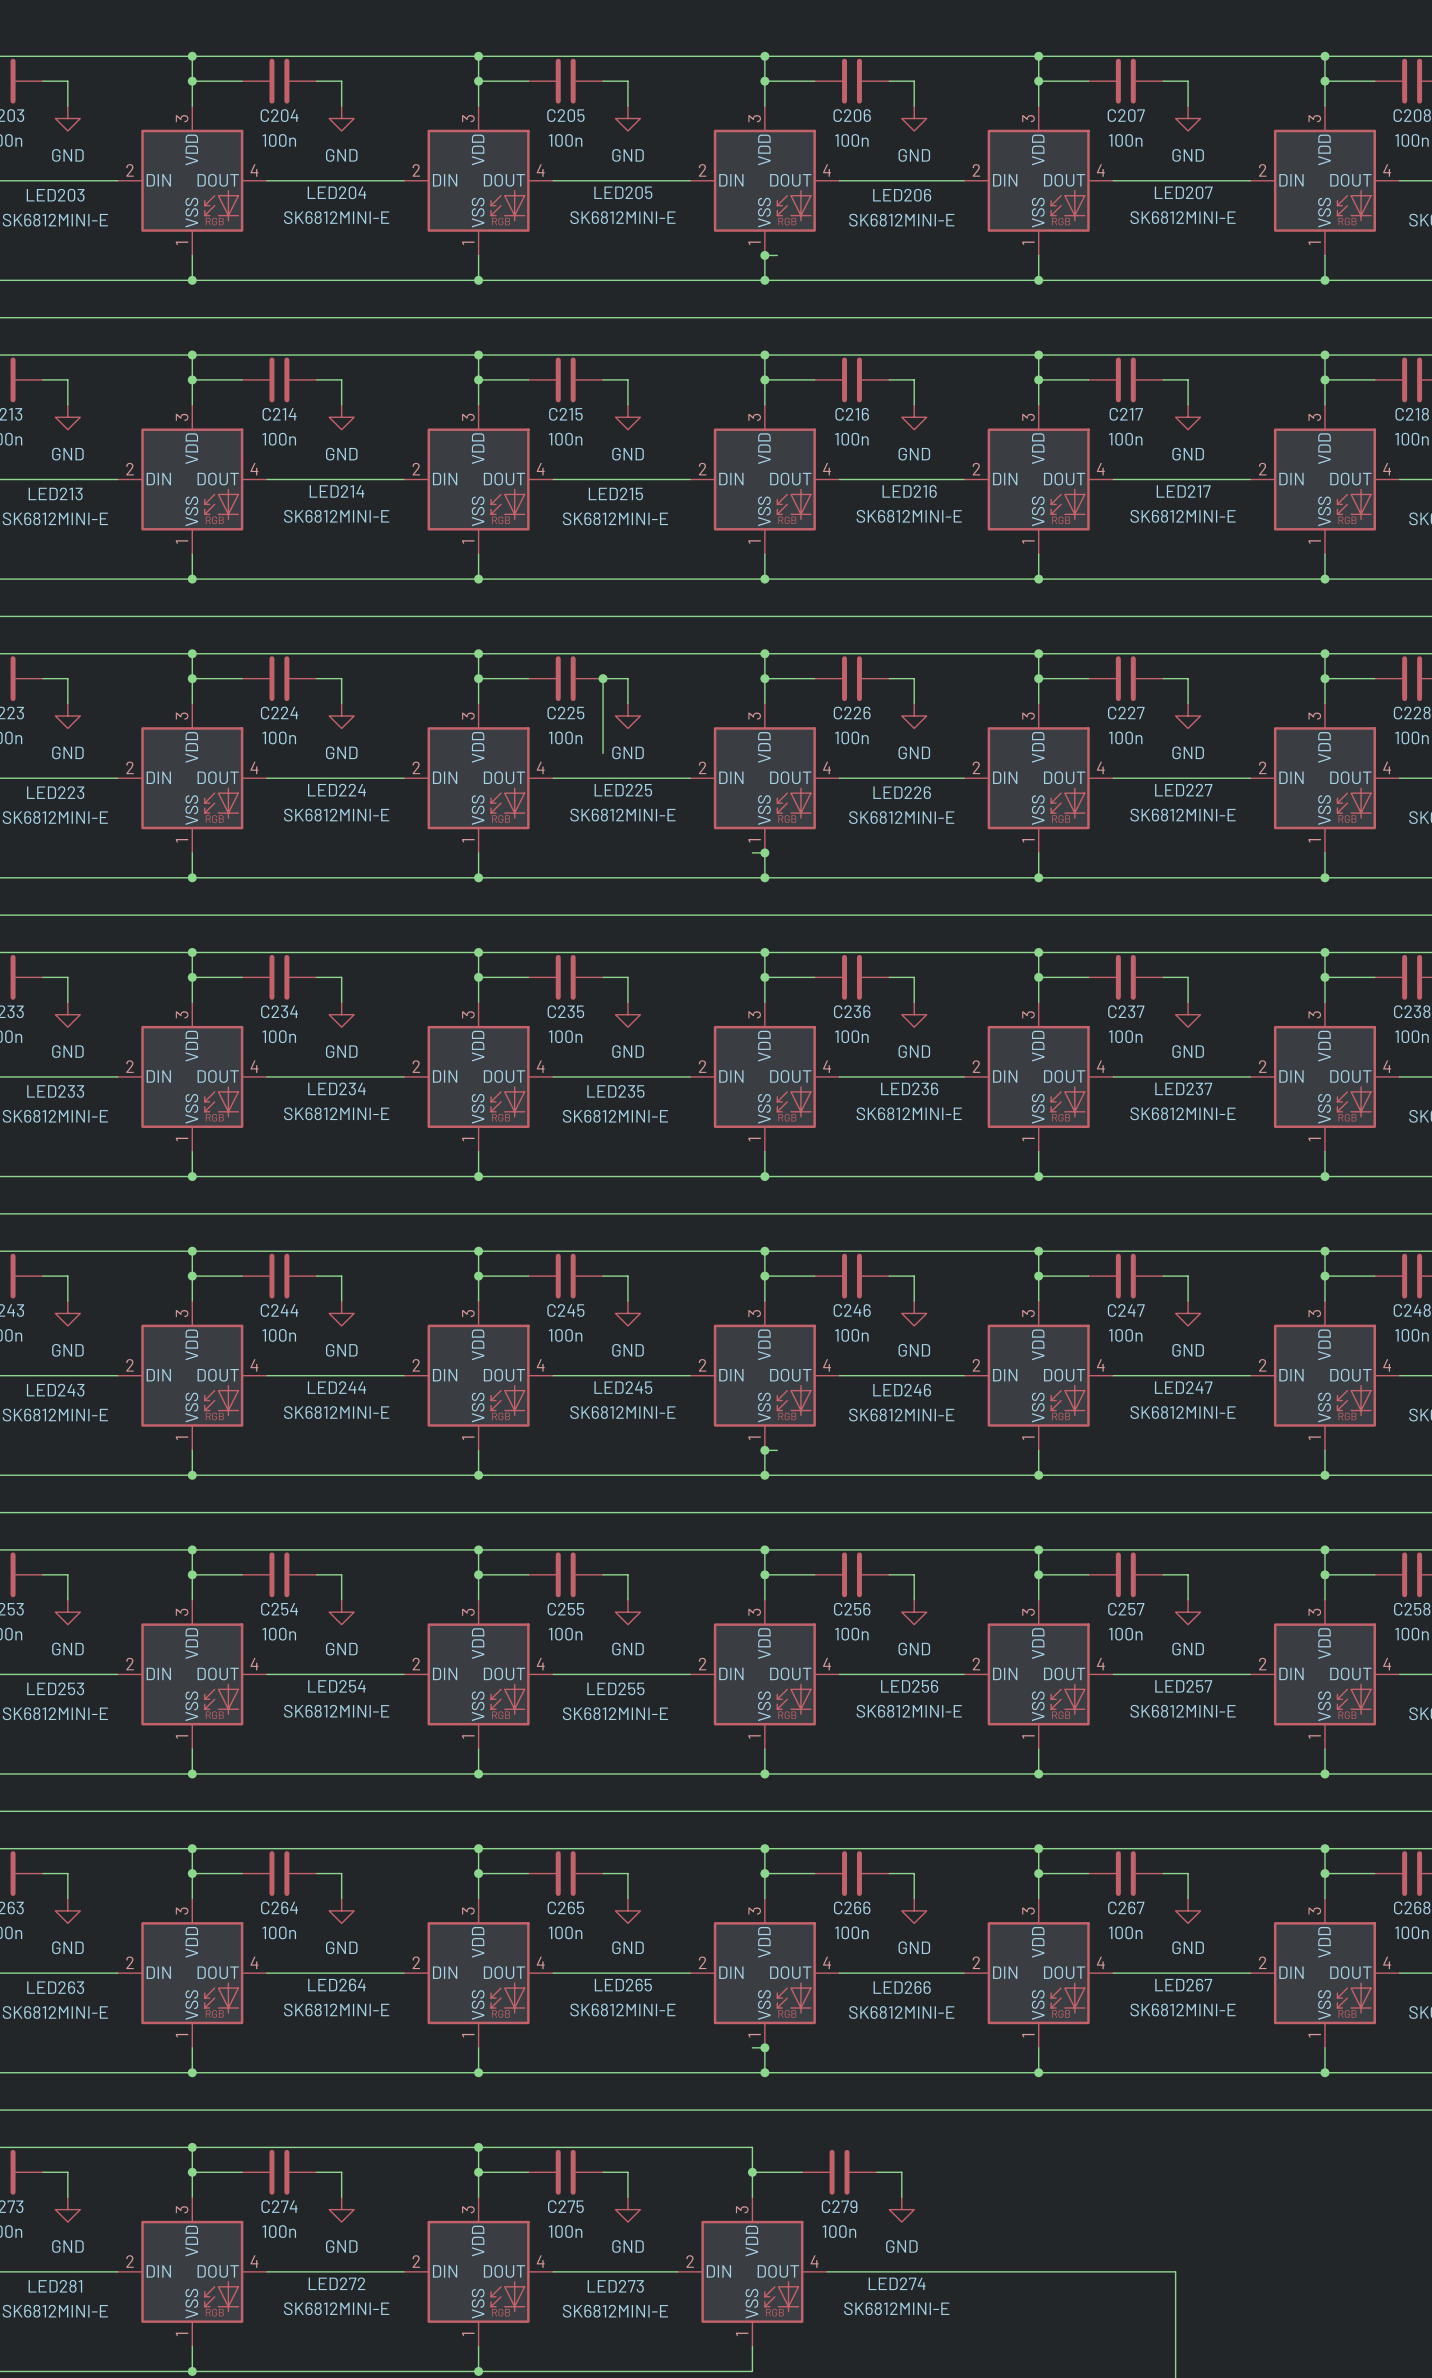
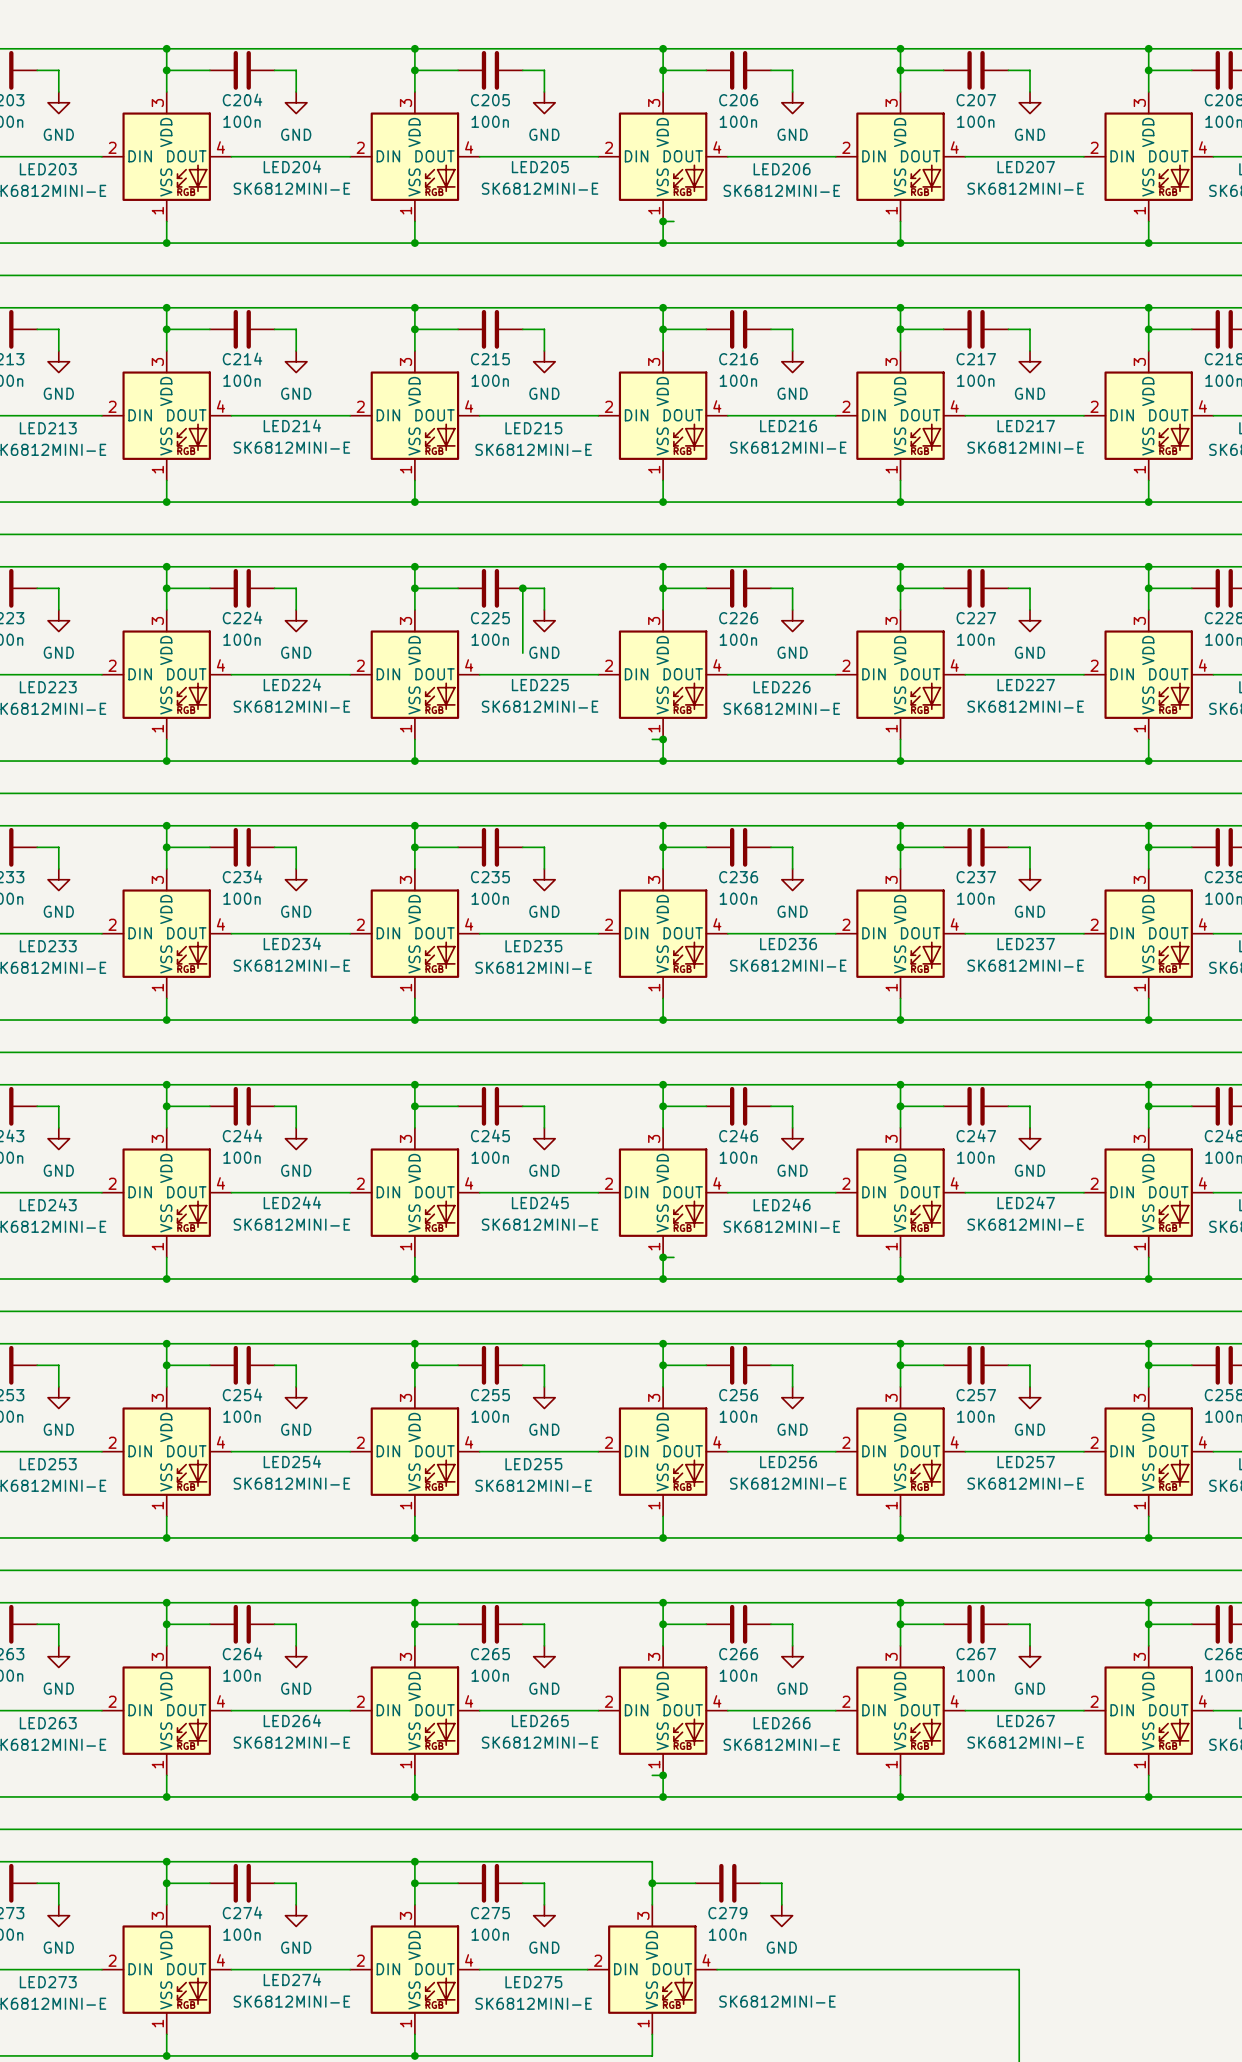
LED272 name: LED272 (337, 2283) -> LED274 (292, 1979)
LED274 name: LED274 (897, 2283) -> none
LED281 name: LED281 (55, 2286) -> LED273 (48, 1982)
LED273 name: LED273 (615, 2286) -> LED275 (533, 1982)

